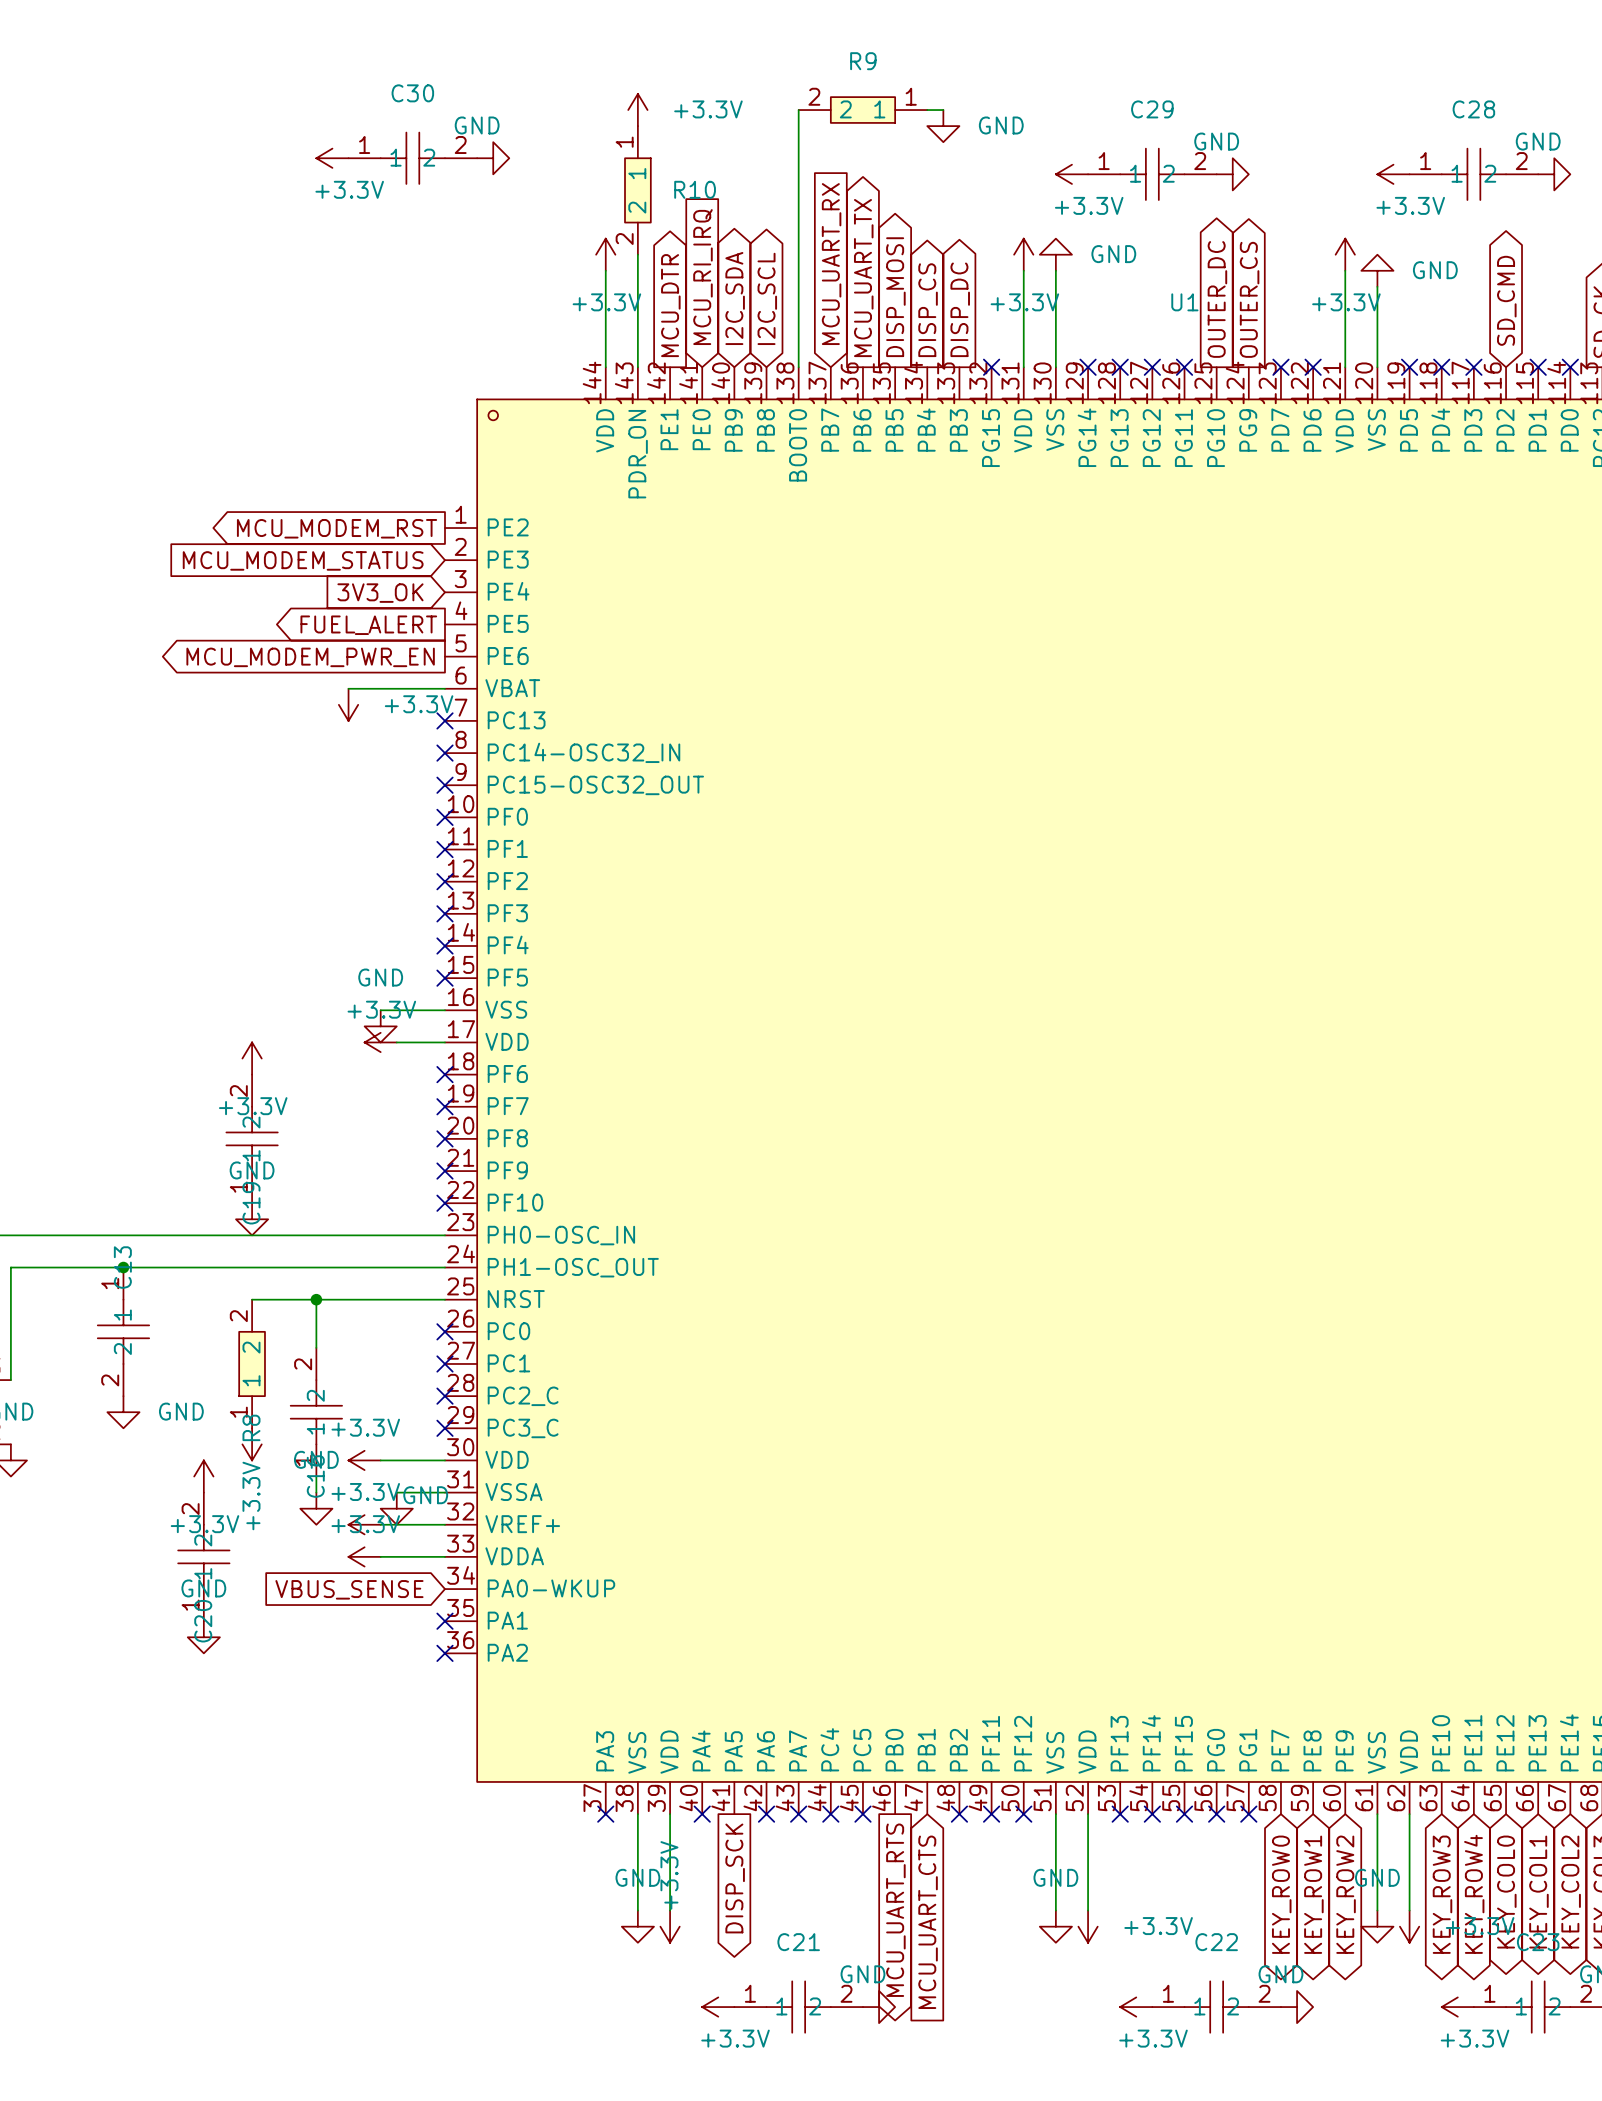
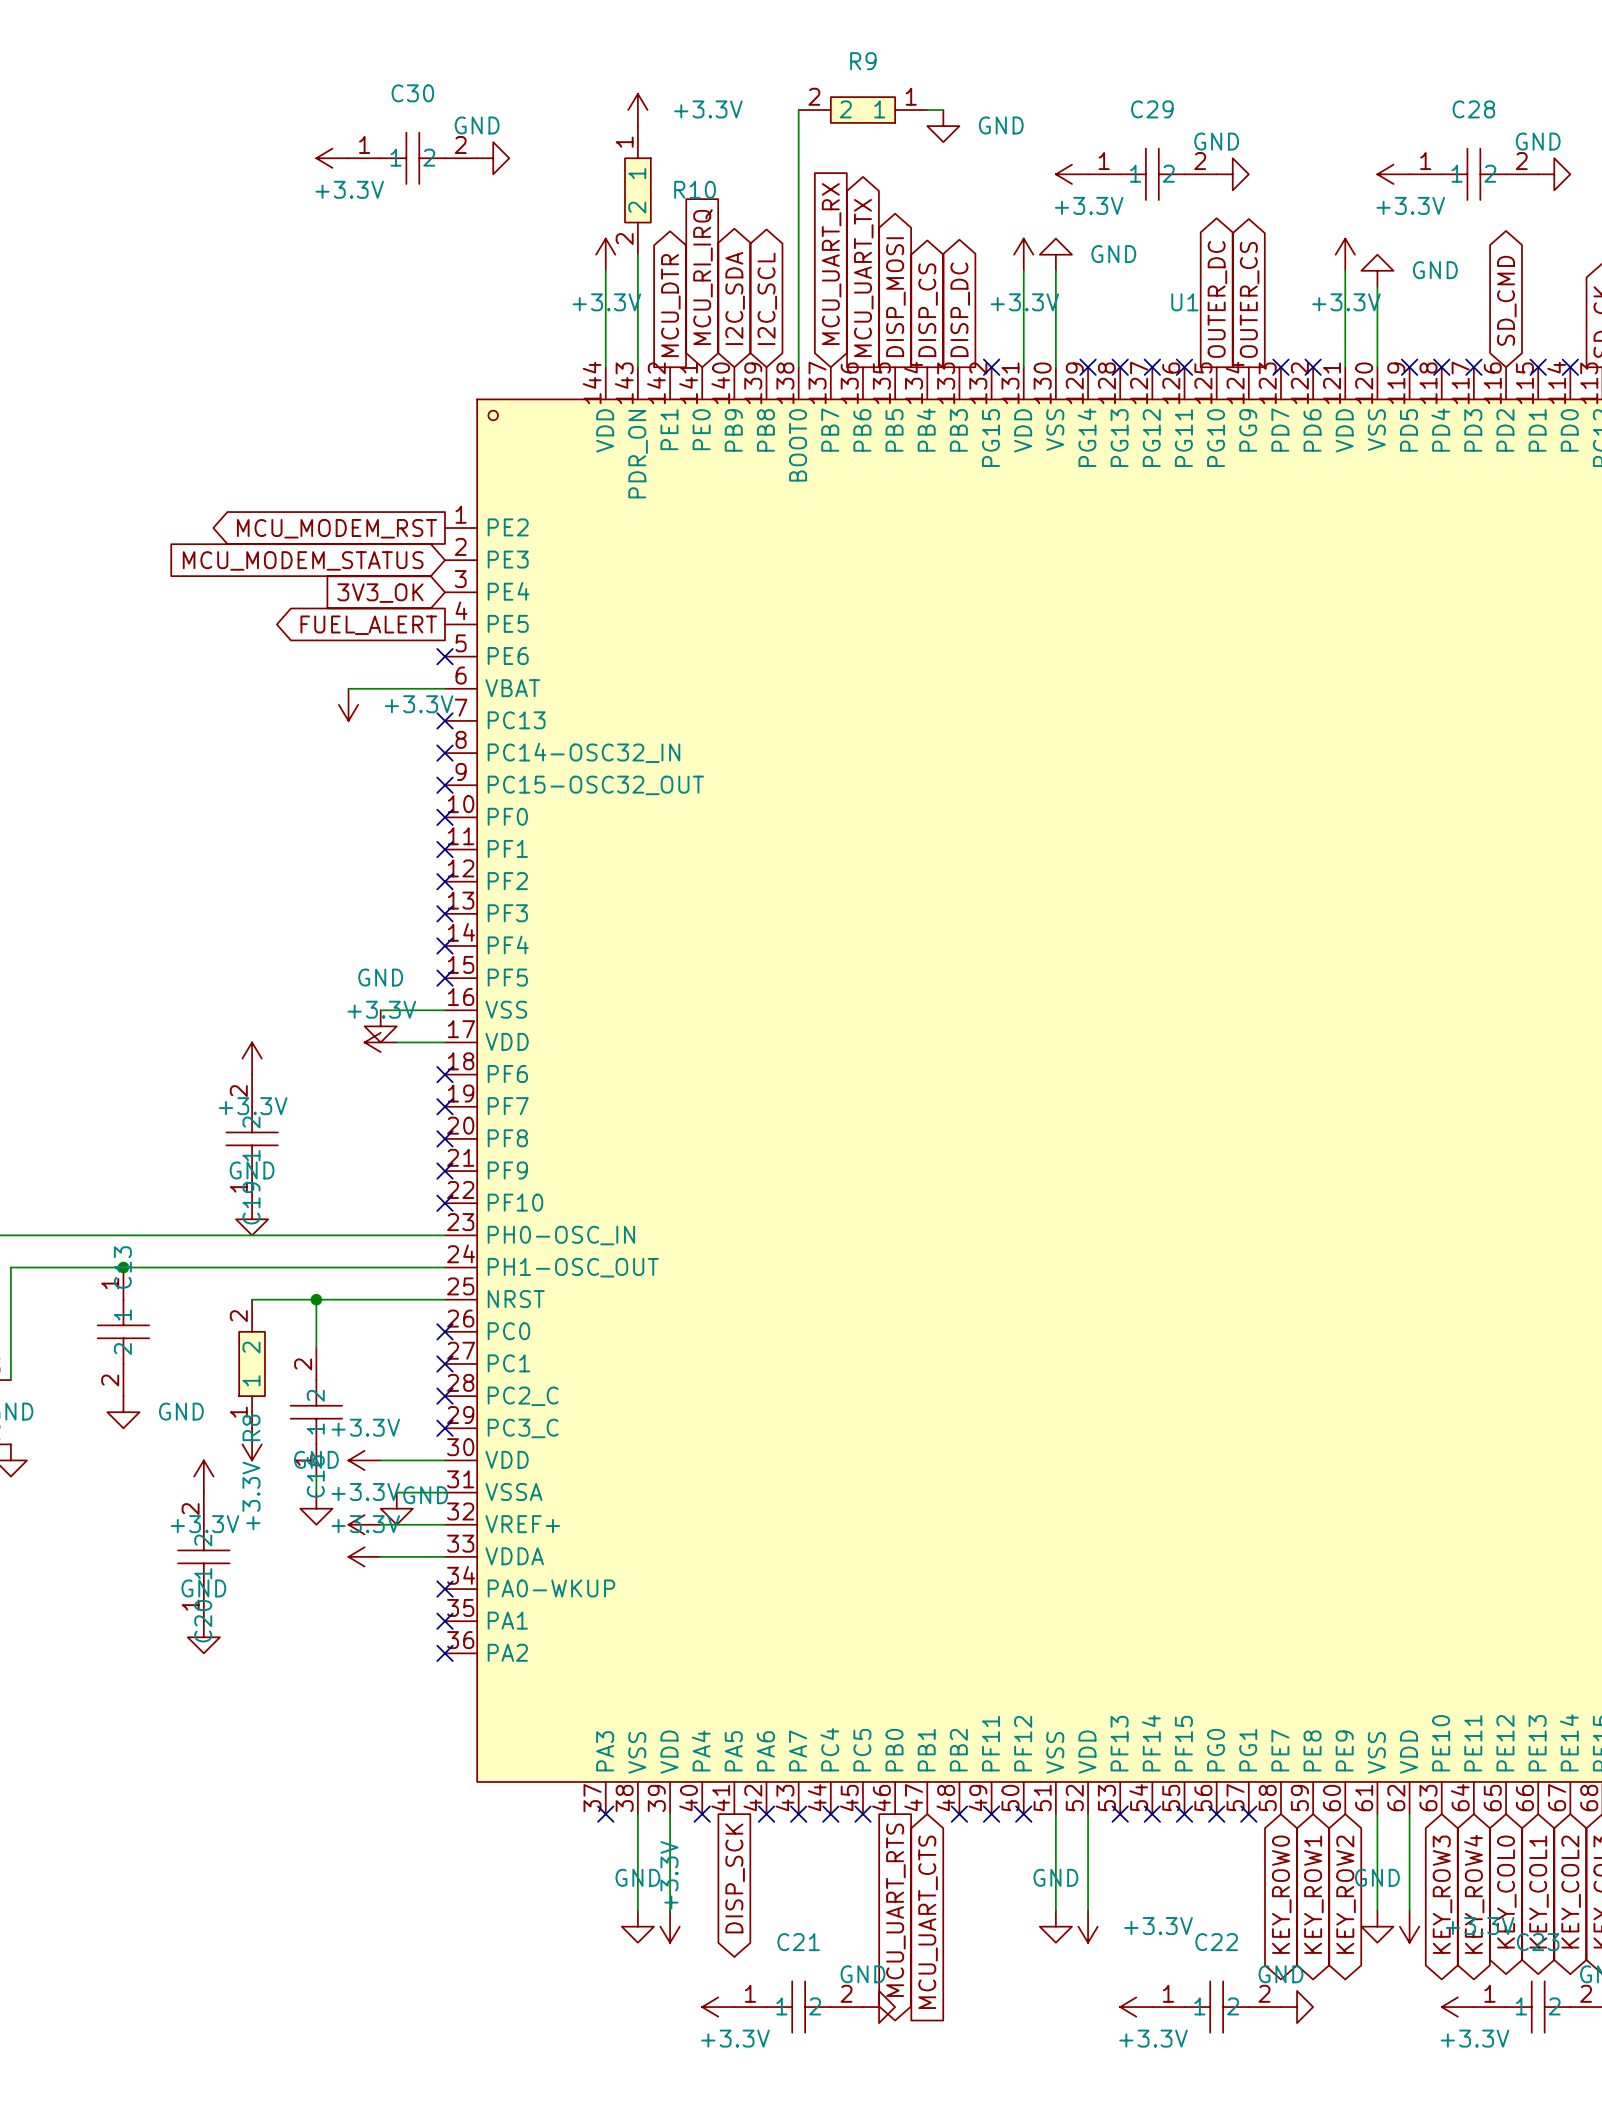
no-connect mark: none -> (444, 656)
global label: MCU_MODEM_PWR_EN (310, 657) -> none
global label: VBUS_SENSE (349, 1589) -> none
no-connect mark: none -> (444, 1589)

